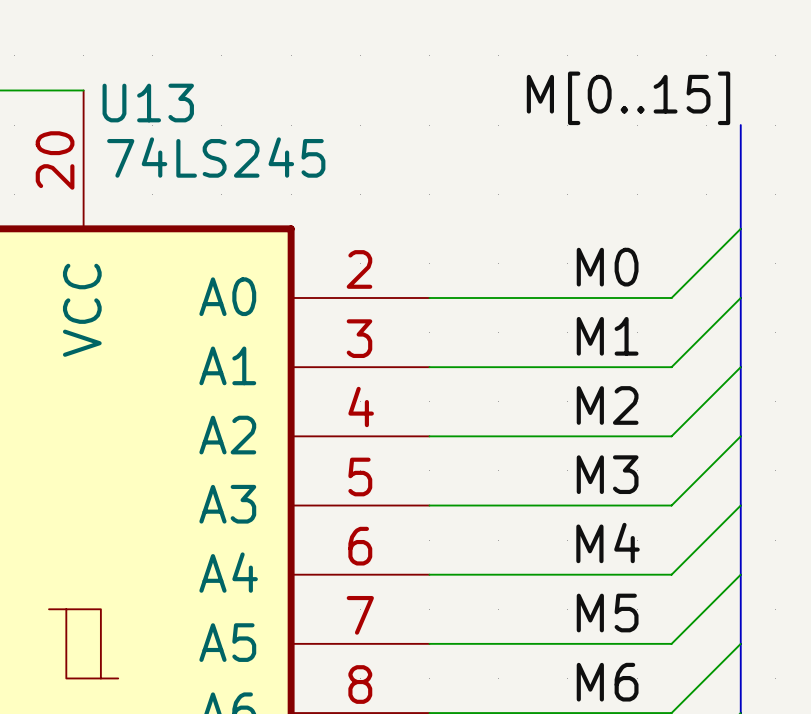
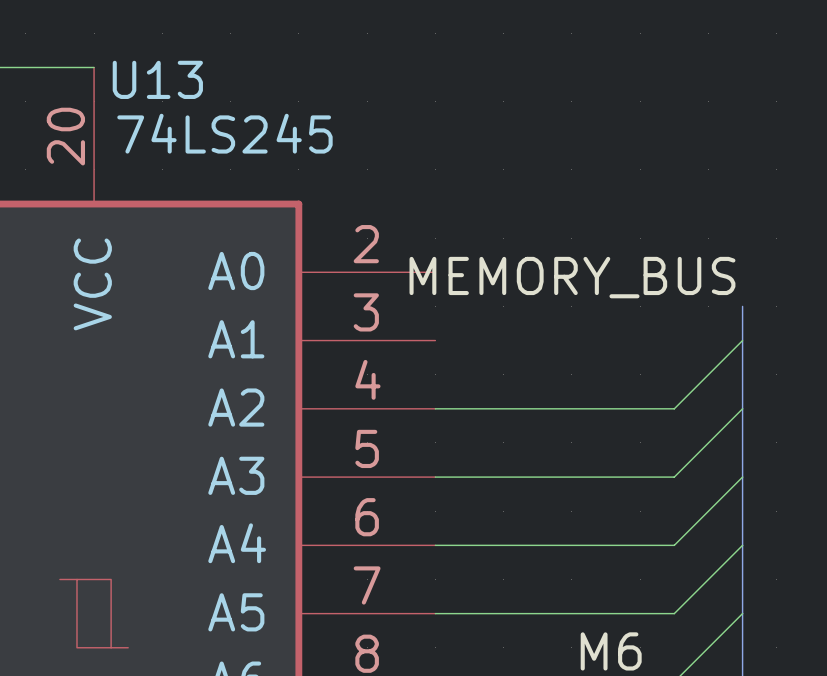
label: M[0..15] (628, 98) -> none
bus: (740, 125) (740, 332) -> none
wire: (740, 228) (671, 298) (429, 298) -> none
label: M0 (607, 267) -> none
wire: (740, 298) (671, 367) (429, 367) -> none
label: none -> MEMORY_BUS (572, 277)
label: M1 (607, 336) -> none
label: M2 (607, 405) -> none
label: M3 (607, 474) -> none
label: M4 (608, 543) -> none
label: M5 (607, 613) -> none

